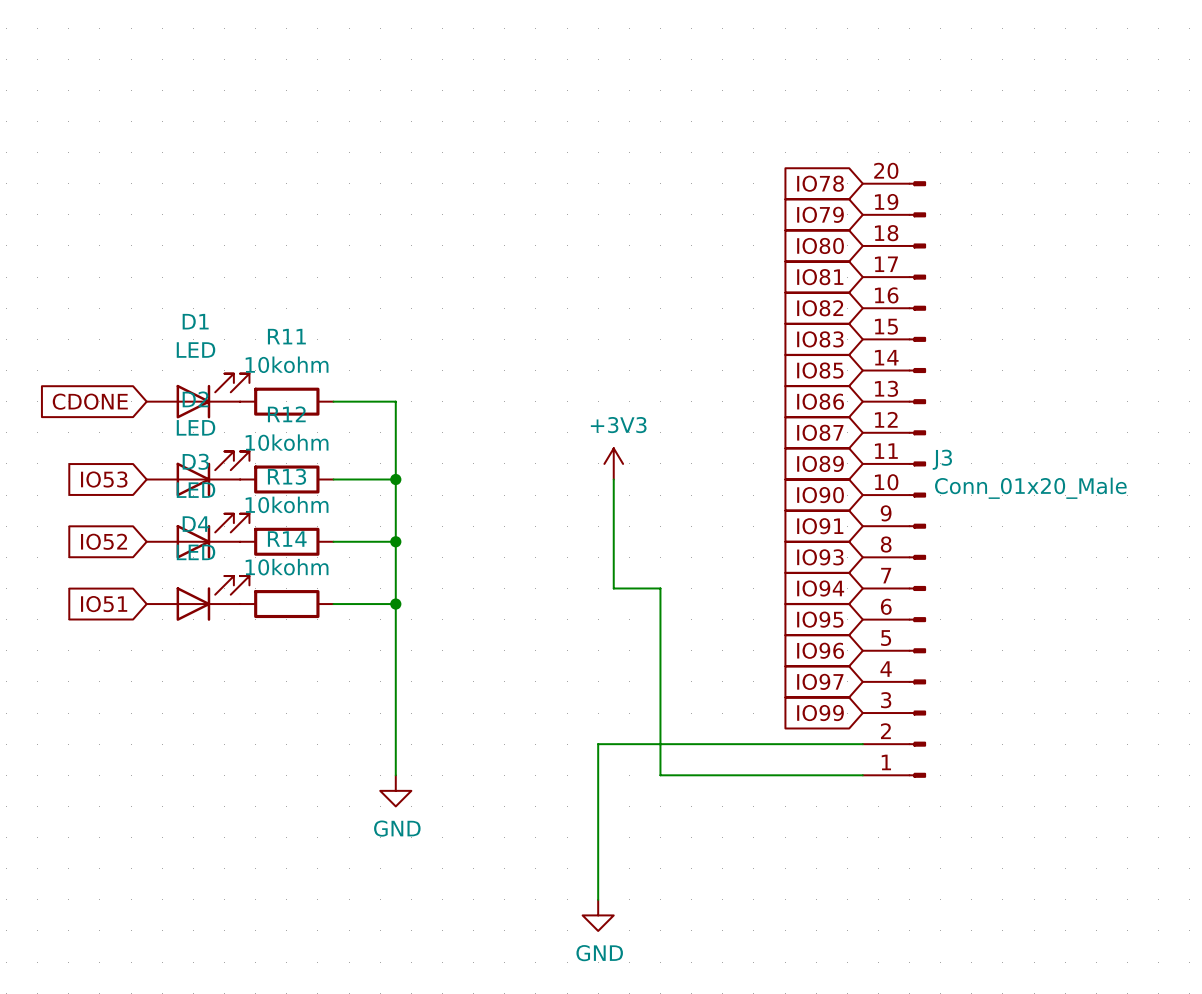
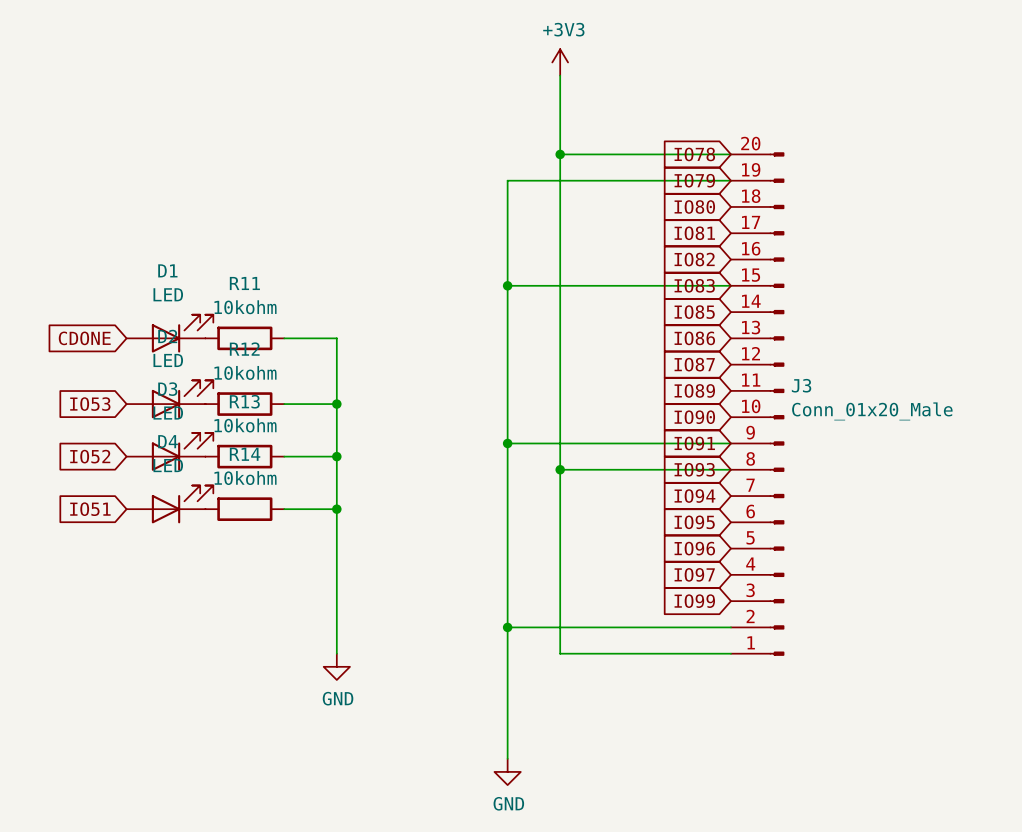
power symbol: none -> +3V3 (560, 62)
wire: none -> (560, 154) (730, 154)
junction: none -> (560, 154)
wire: none -> (730, 180) (507, 180) (507, 627)
wire: none -> (507, 285) (730, 285)
junction: none -> (507, 285)
power symbol: +3V3 (613, 463) -> none
wire: (613, 479) (613, 588) (660, 588) -> (560, 75) (560, 496)
wire: none -> (507, 443) (730, 443)
junction: none -> (507, 443)
wire: none -> (560, 469) (730, 469)
junction: none -> (560, 469)
junction: none -> (507, 627)

